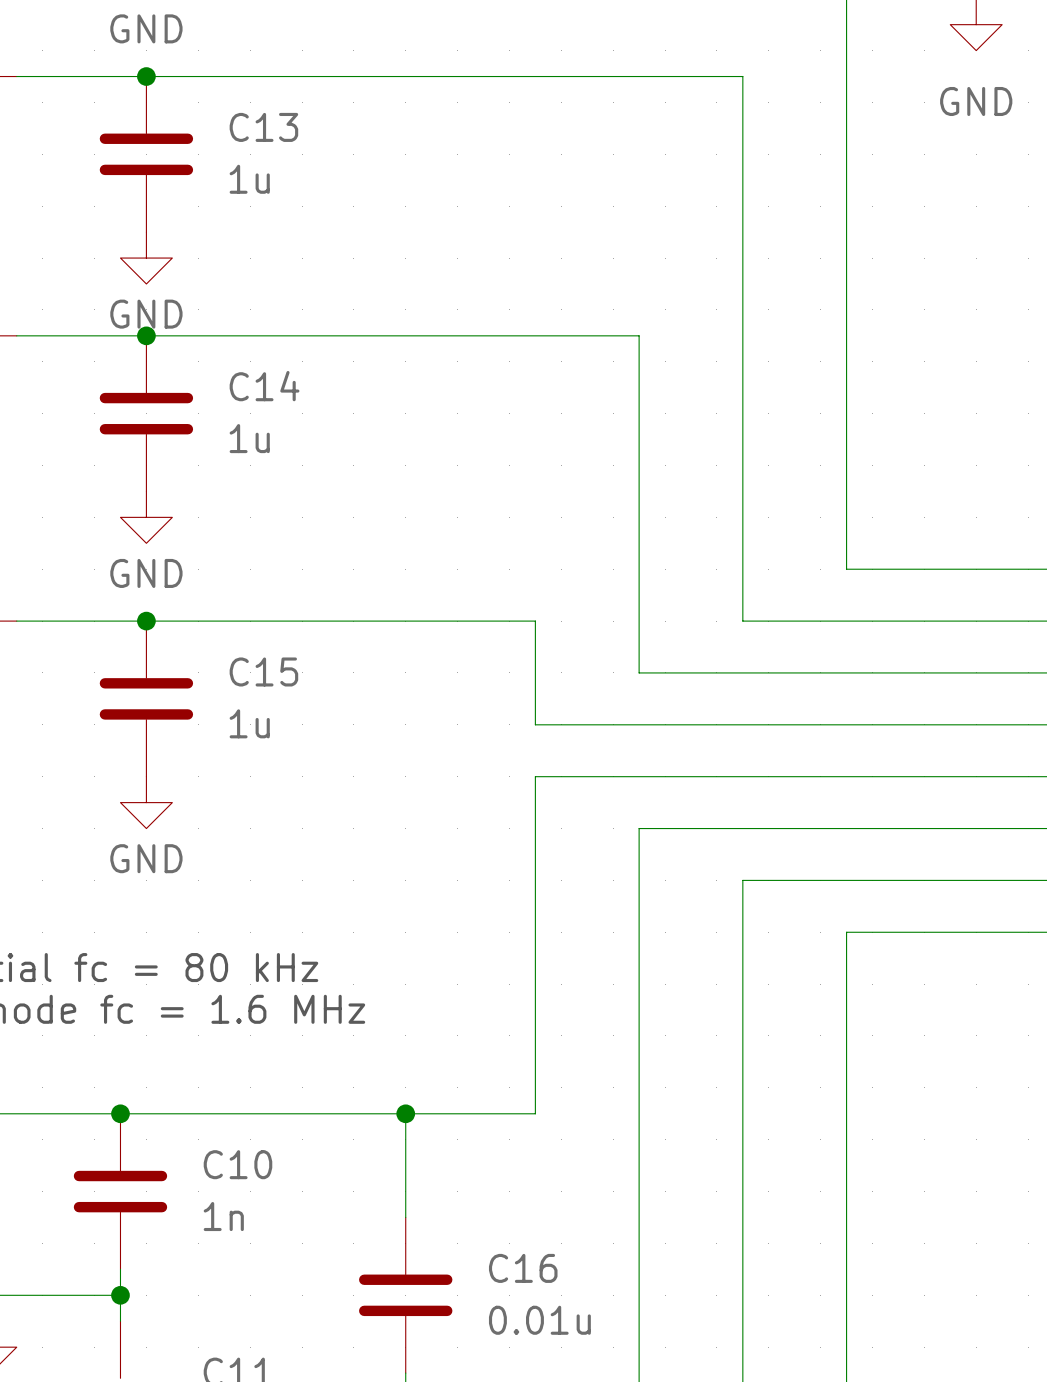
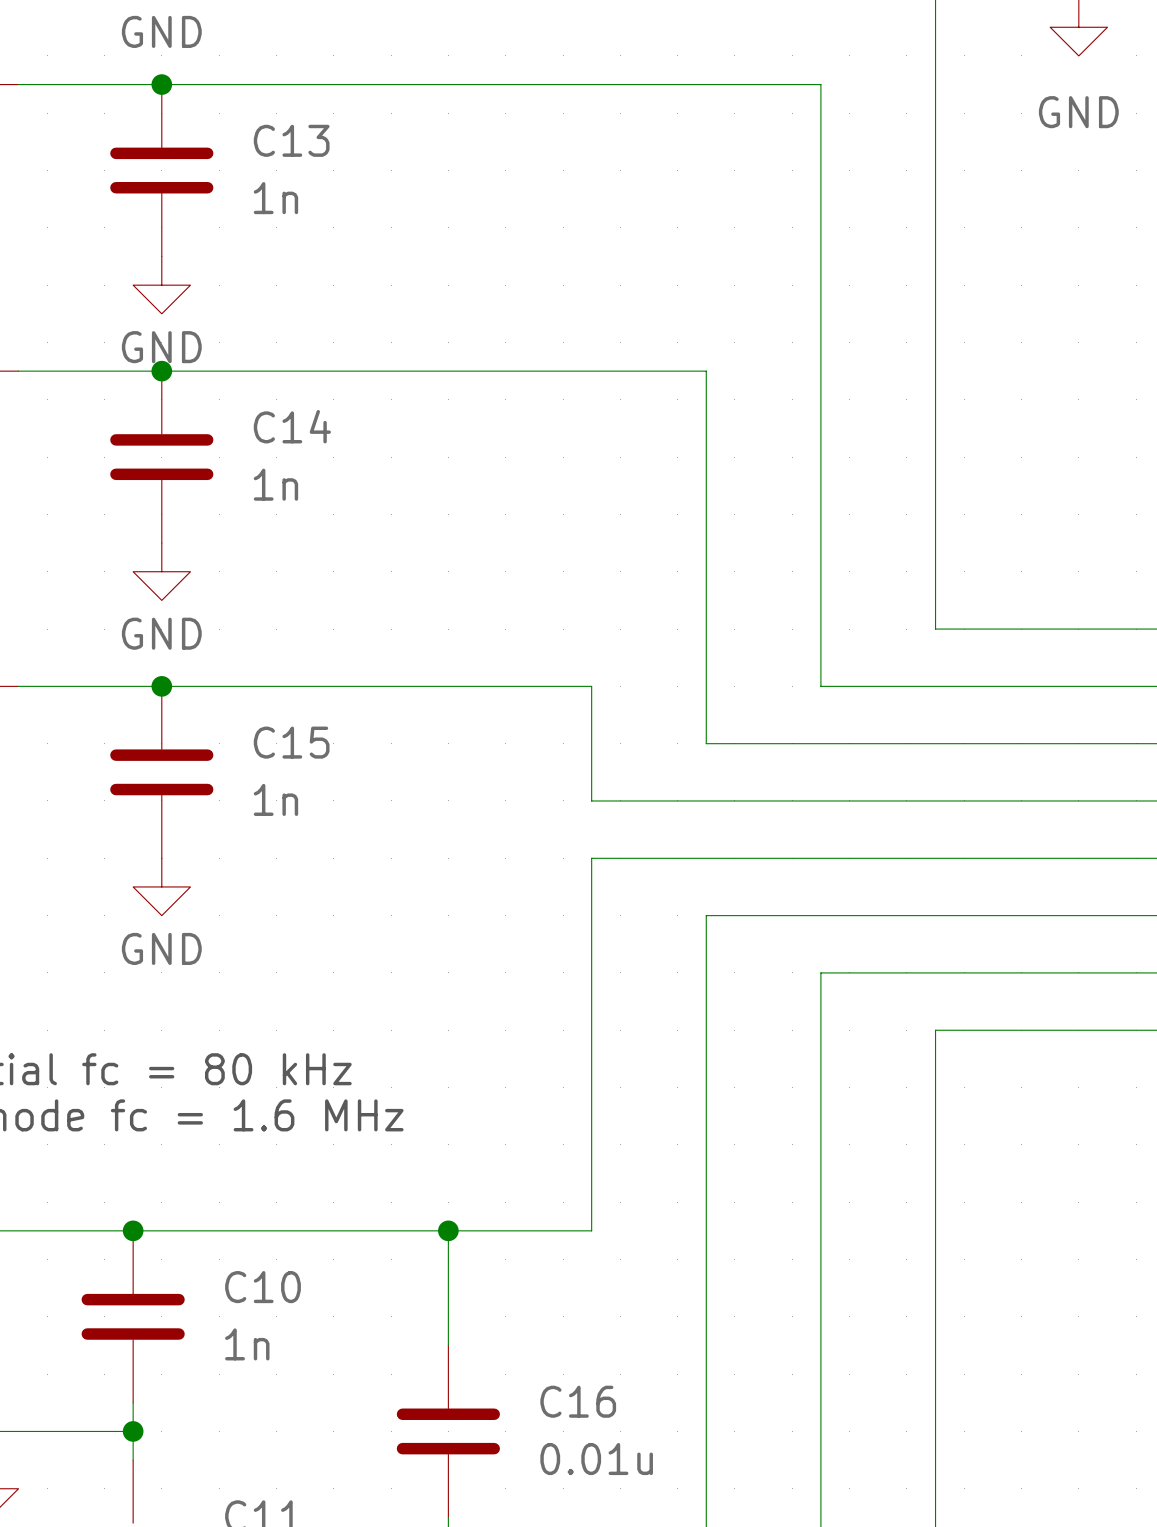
C13 value: 1u (249, 179) -> 1n (275, 198)
C14 value: 1u (249, 438) -> 1n (275, 484)
C15 value: 1u (249, 723) -> 1n (275, 799)

